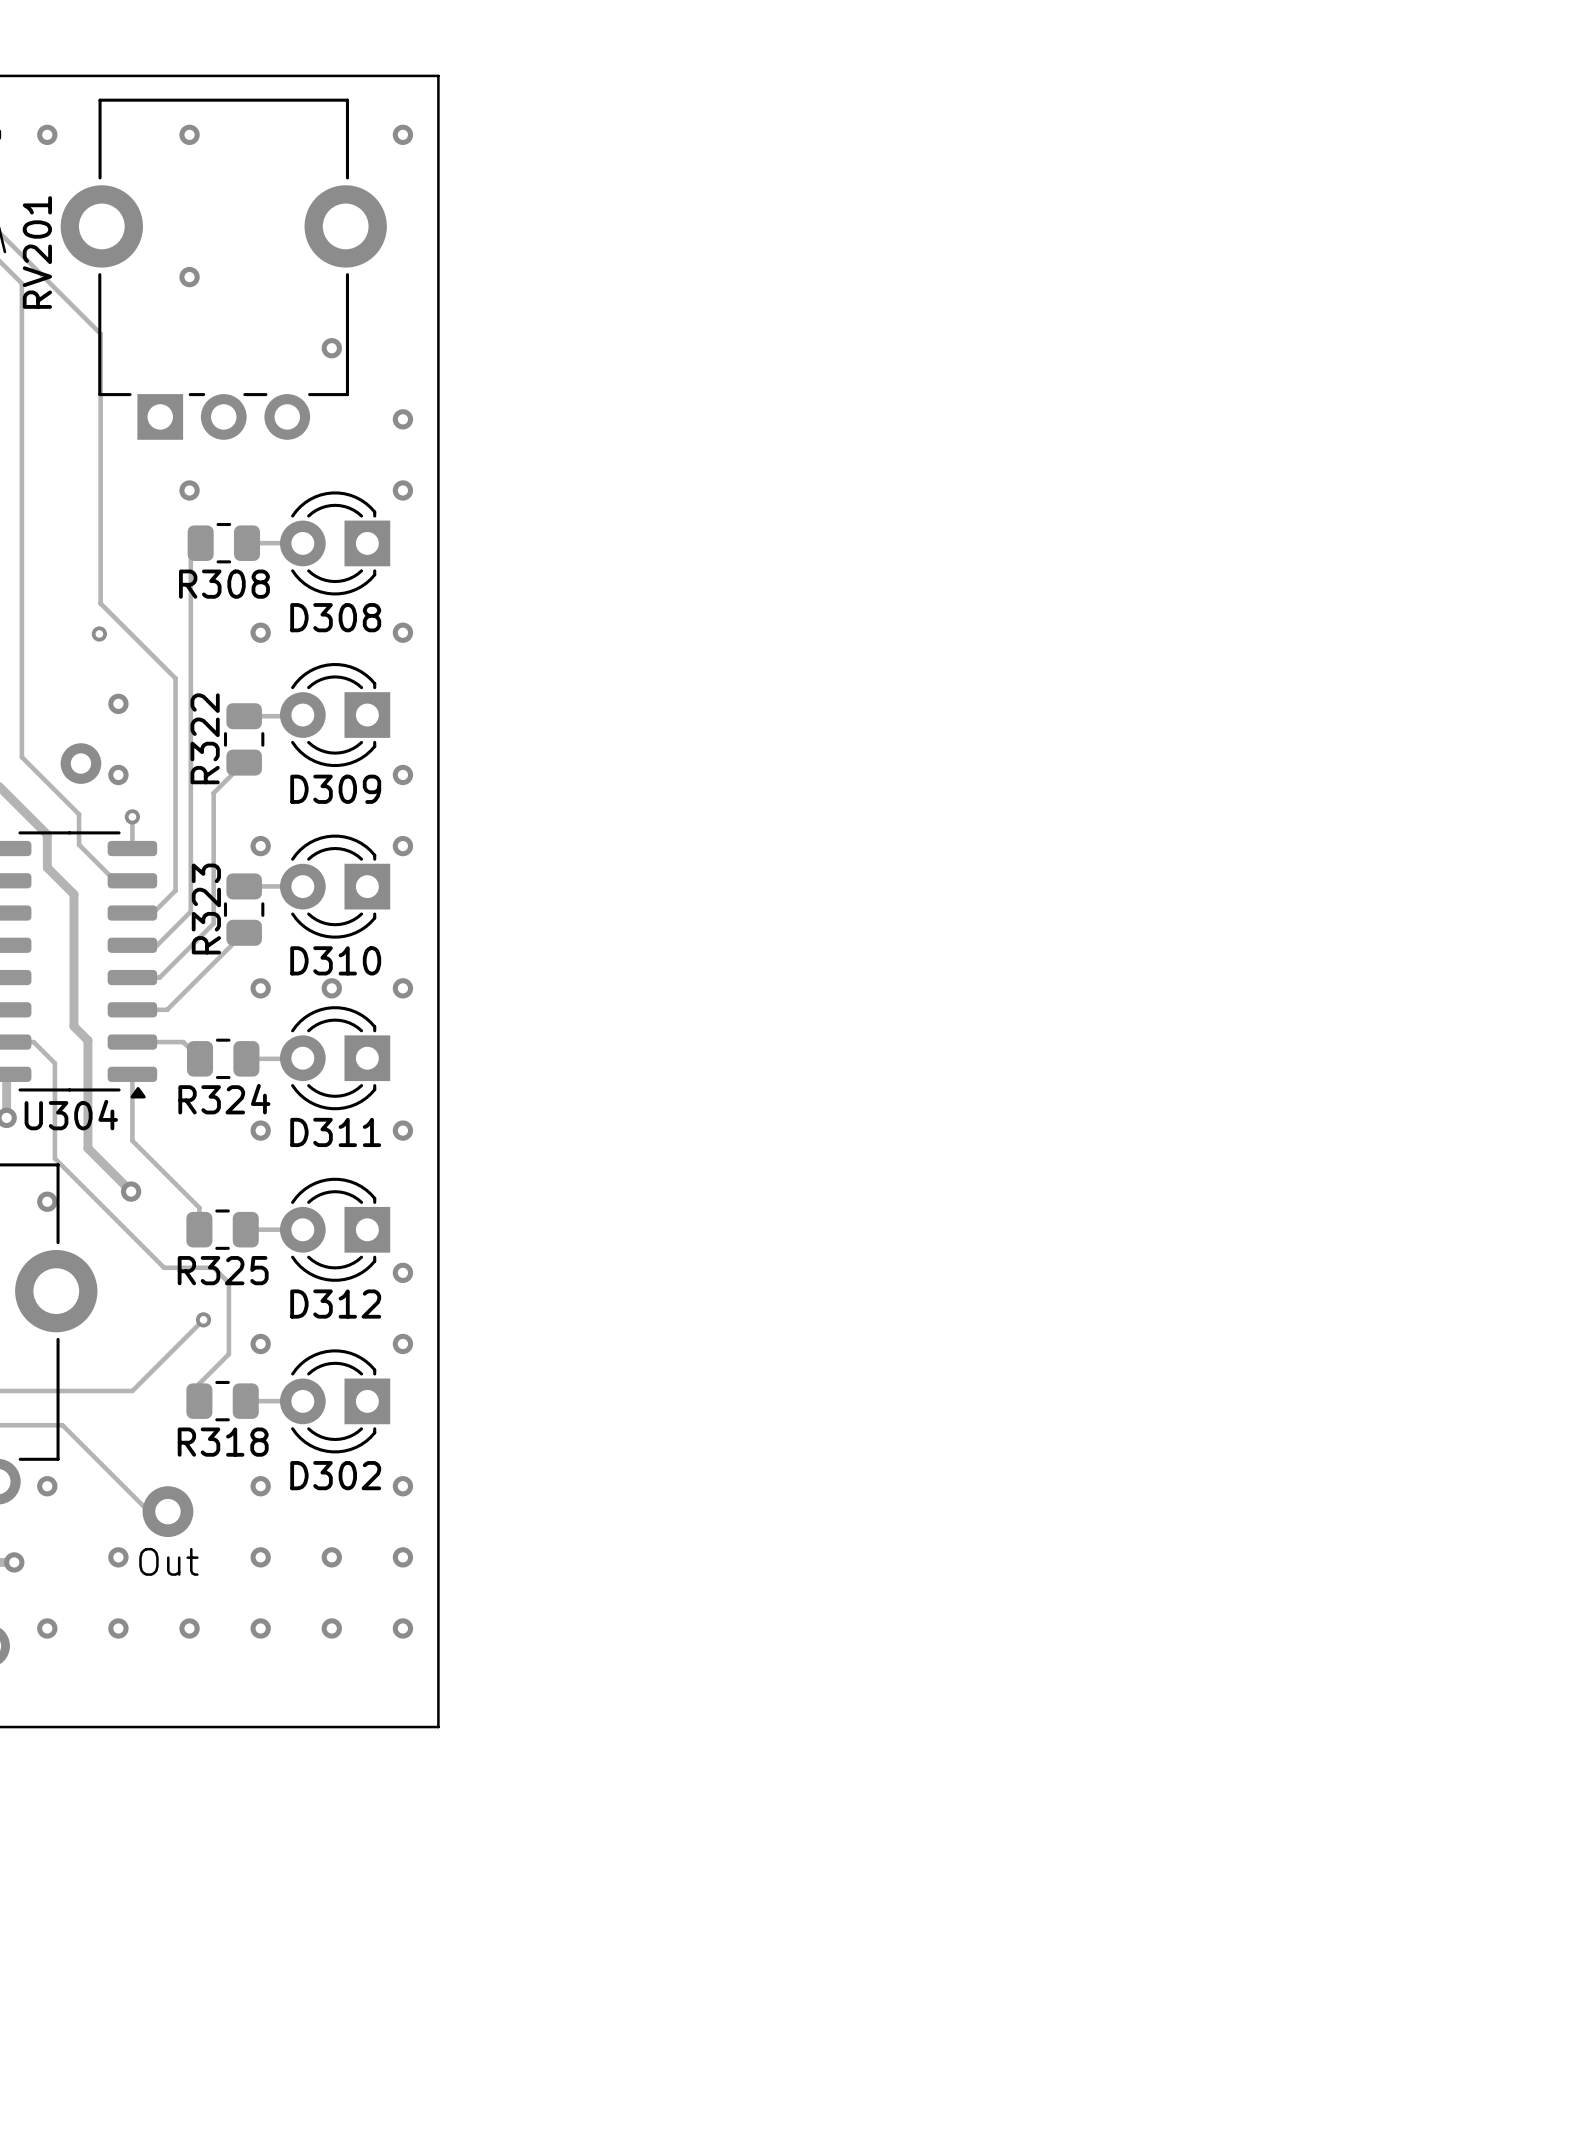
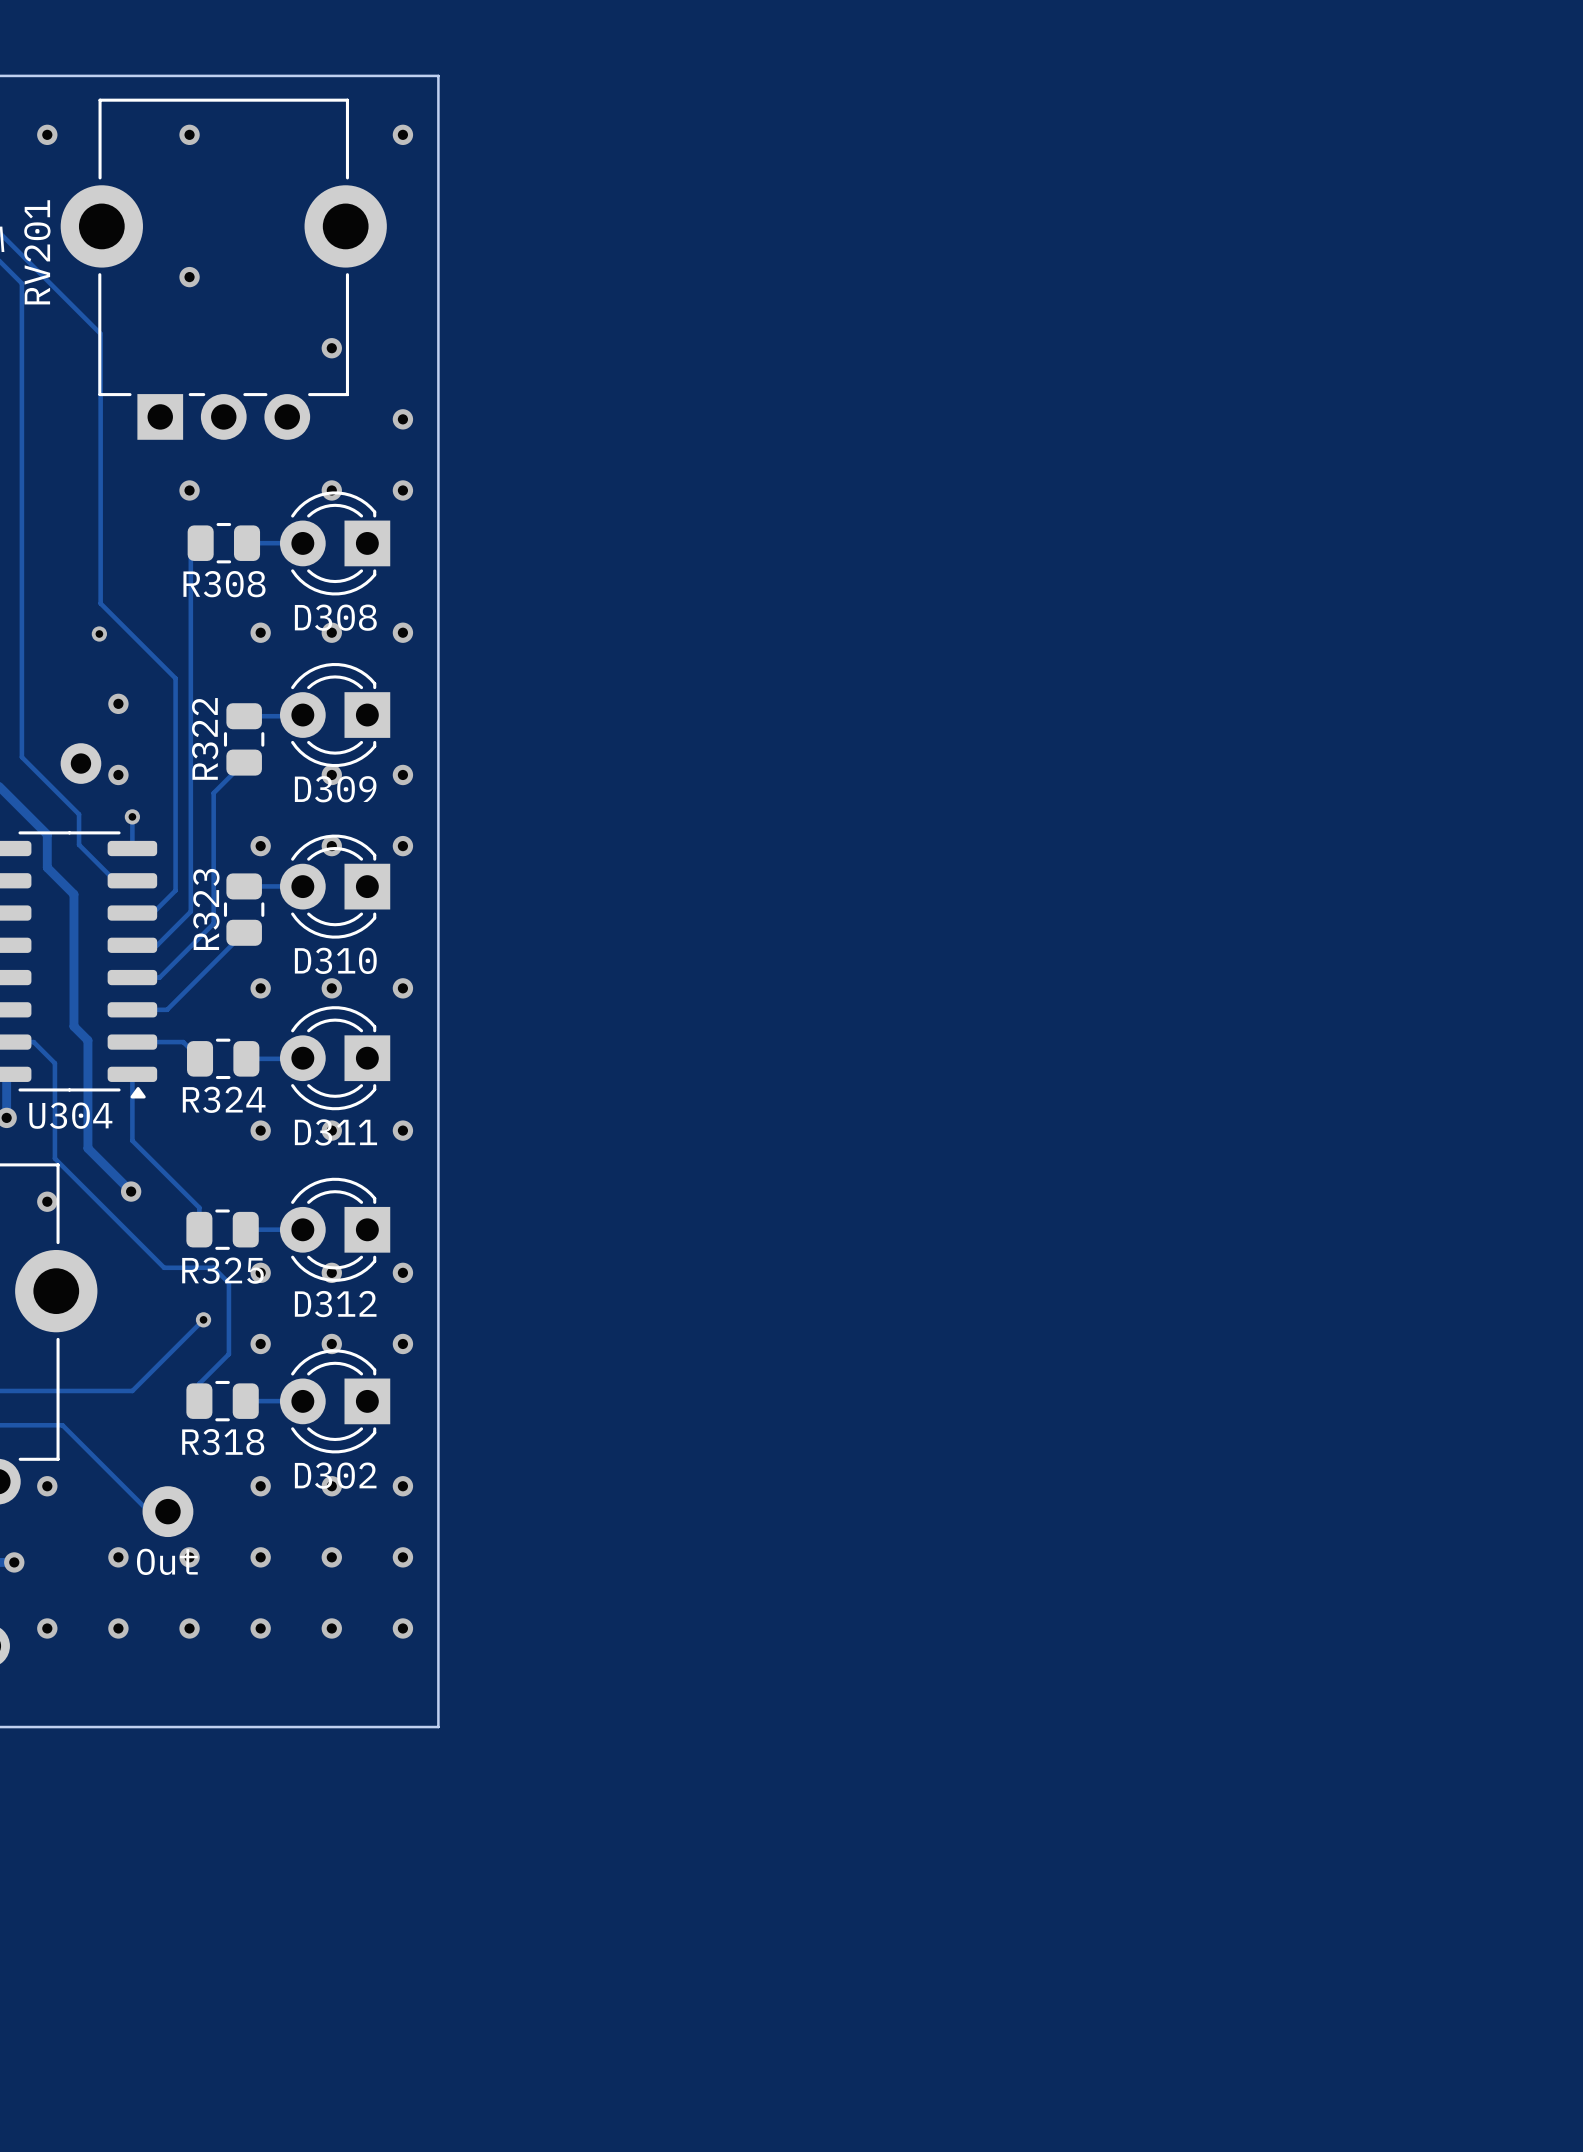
via: none -> (331, 490)
via: none -> (331, 632)
via: none -> (331, 774)
via: none -> (331, 846)
via: none -> (331, 1130)
via: none -> (260, 1272)
via: none -> (331, 1272)
via: none -> (331, 1343)
via: none -> (331, 1486)
via: none -> (189, 1557)

